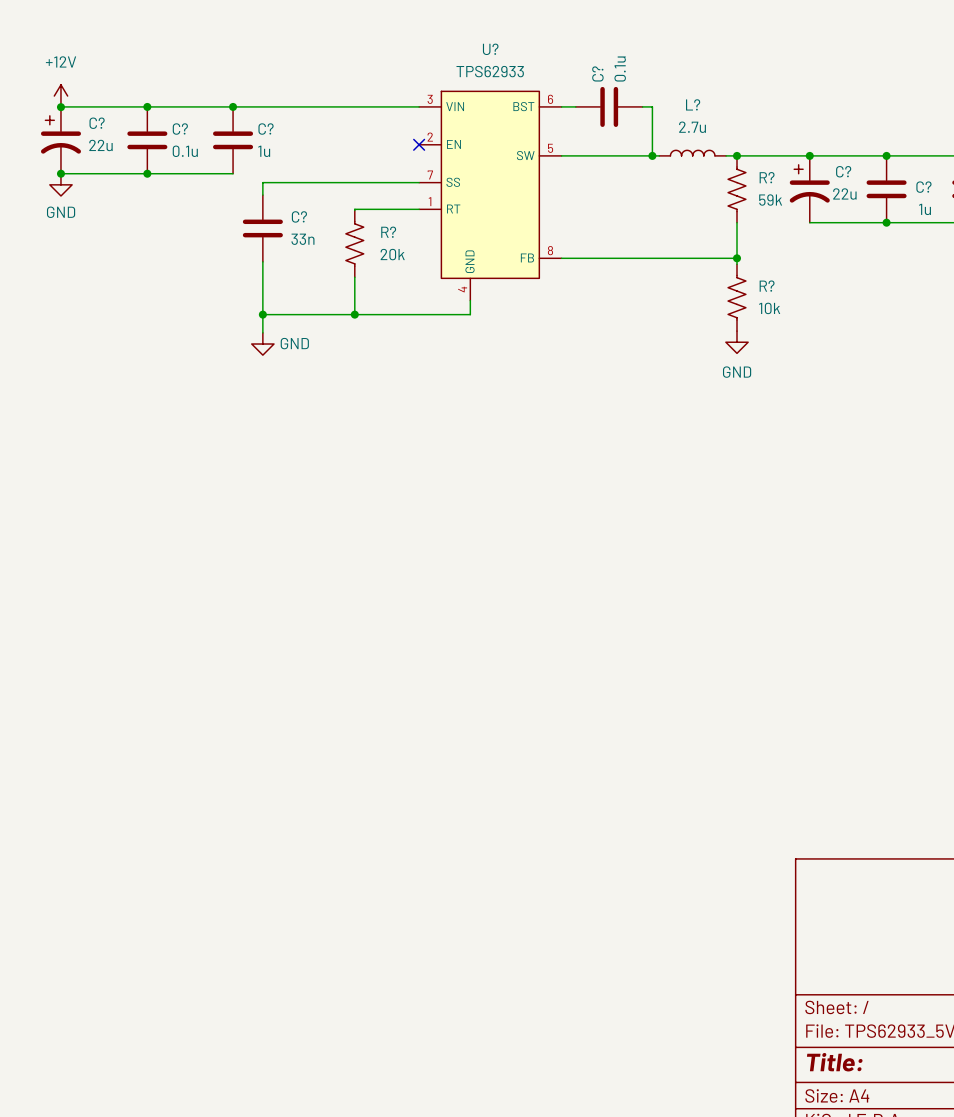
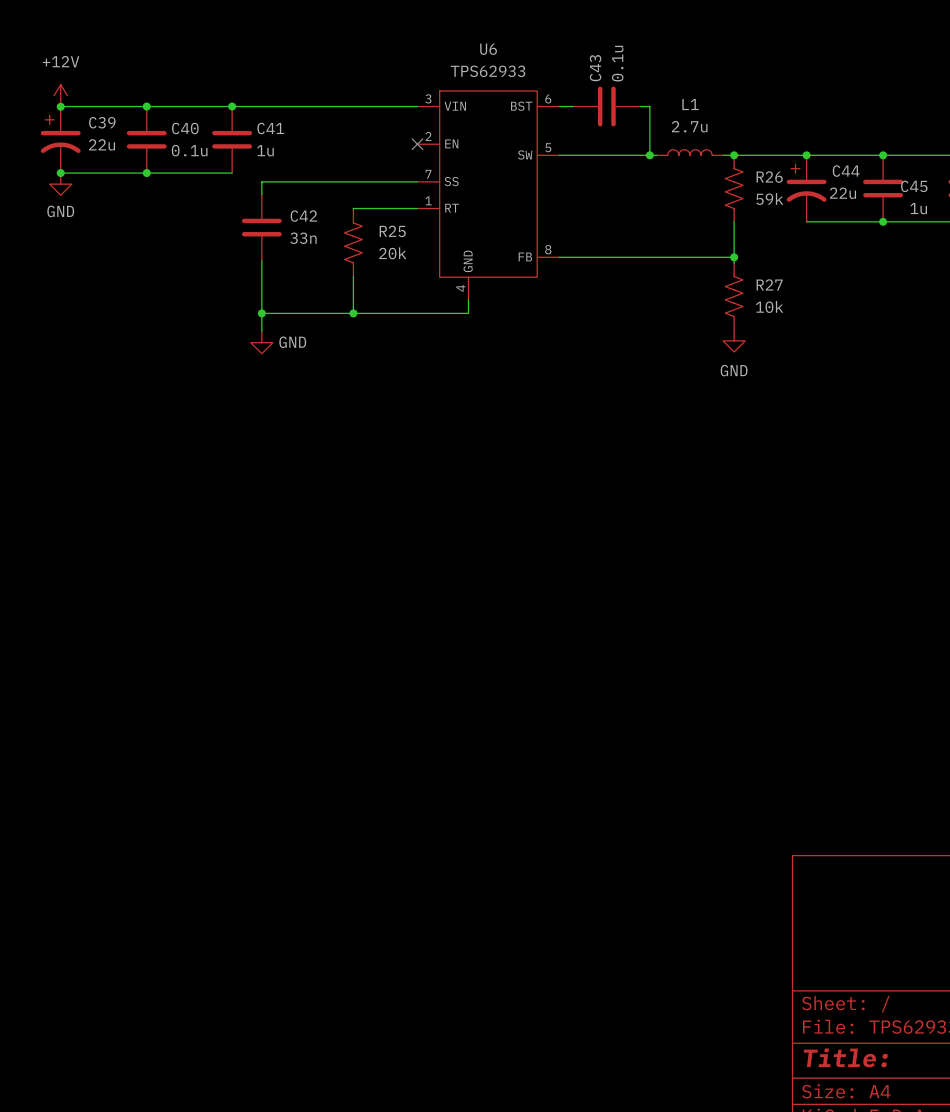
U? name: U? (490, 49) -> U6 (488, 49)
C? name: C? (597, 73) -> C43 (595, 68)
L? name: L? (693, 104) -> L1 (690, 104)
C? name: C? (97, 123) -> C39 (102, 122)
C? name: C? (180, 129) -> C40 (185, 128)
C? name: C? (266, 129) -> C41 (270, 128)
C? name: C? (843, 171) -> C44 (846, 171)
R? name: R? (767, 177) -> R26 (769, 177)
C? name: C? (923, 187) -> C45 (914, 186)
C? name: C? (299, 216) -> C42 (303, 216)
R? name: R? (388, 232) -> R25 (392, 231)
R? name: R? (767, 286) -> R27 (769, 284)

